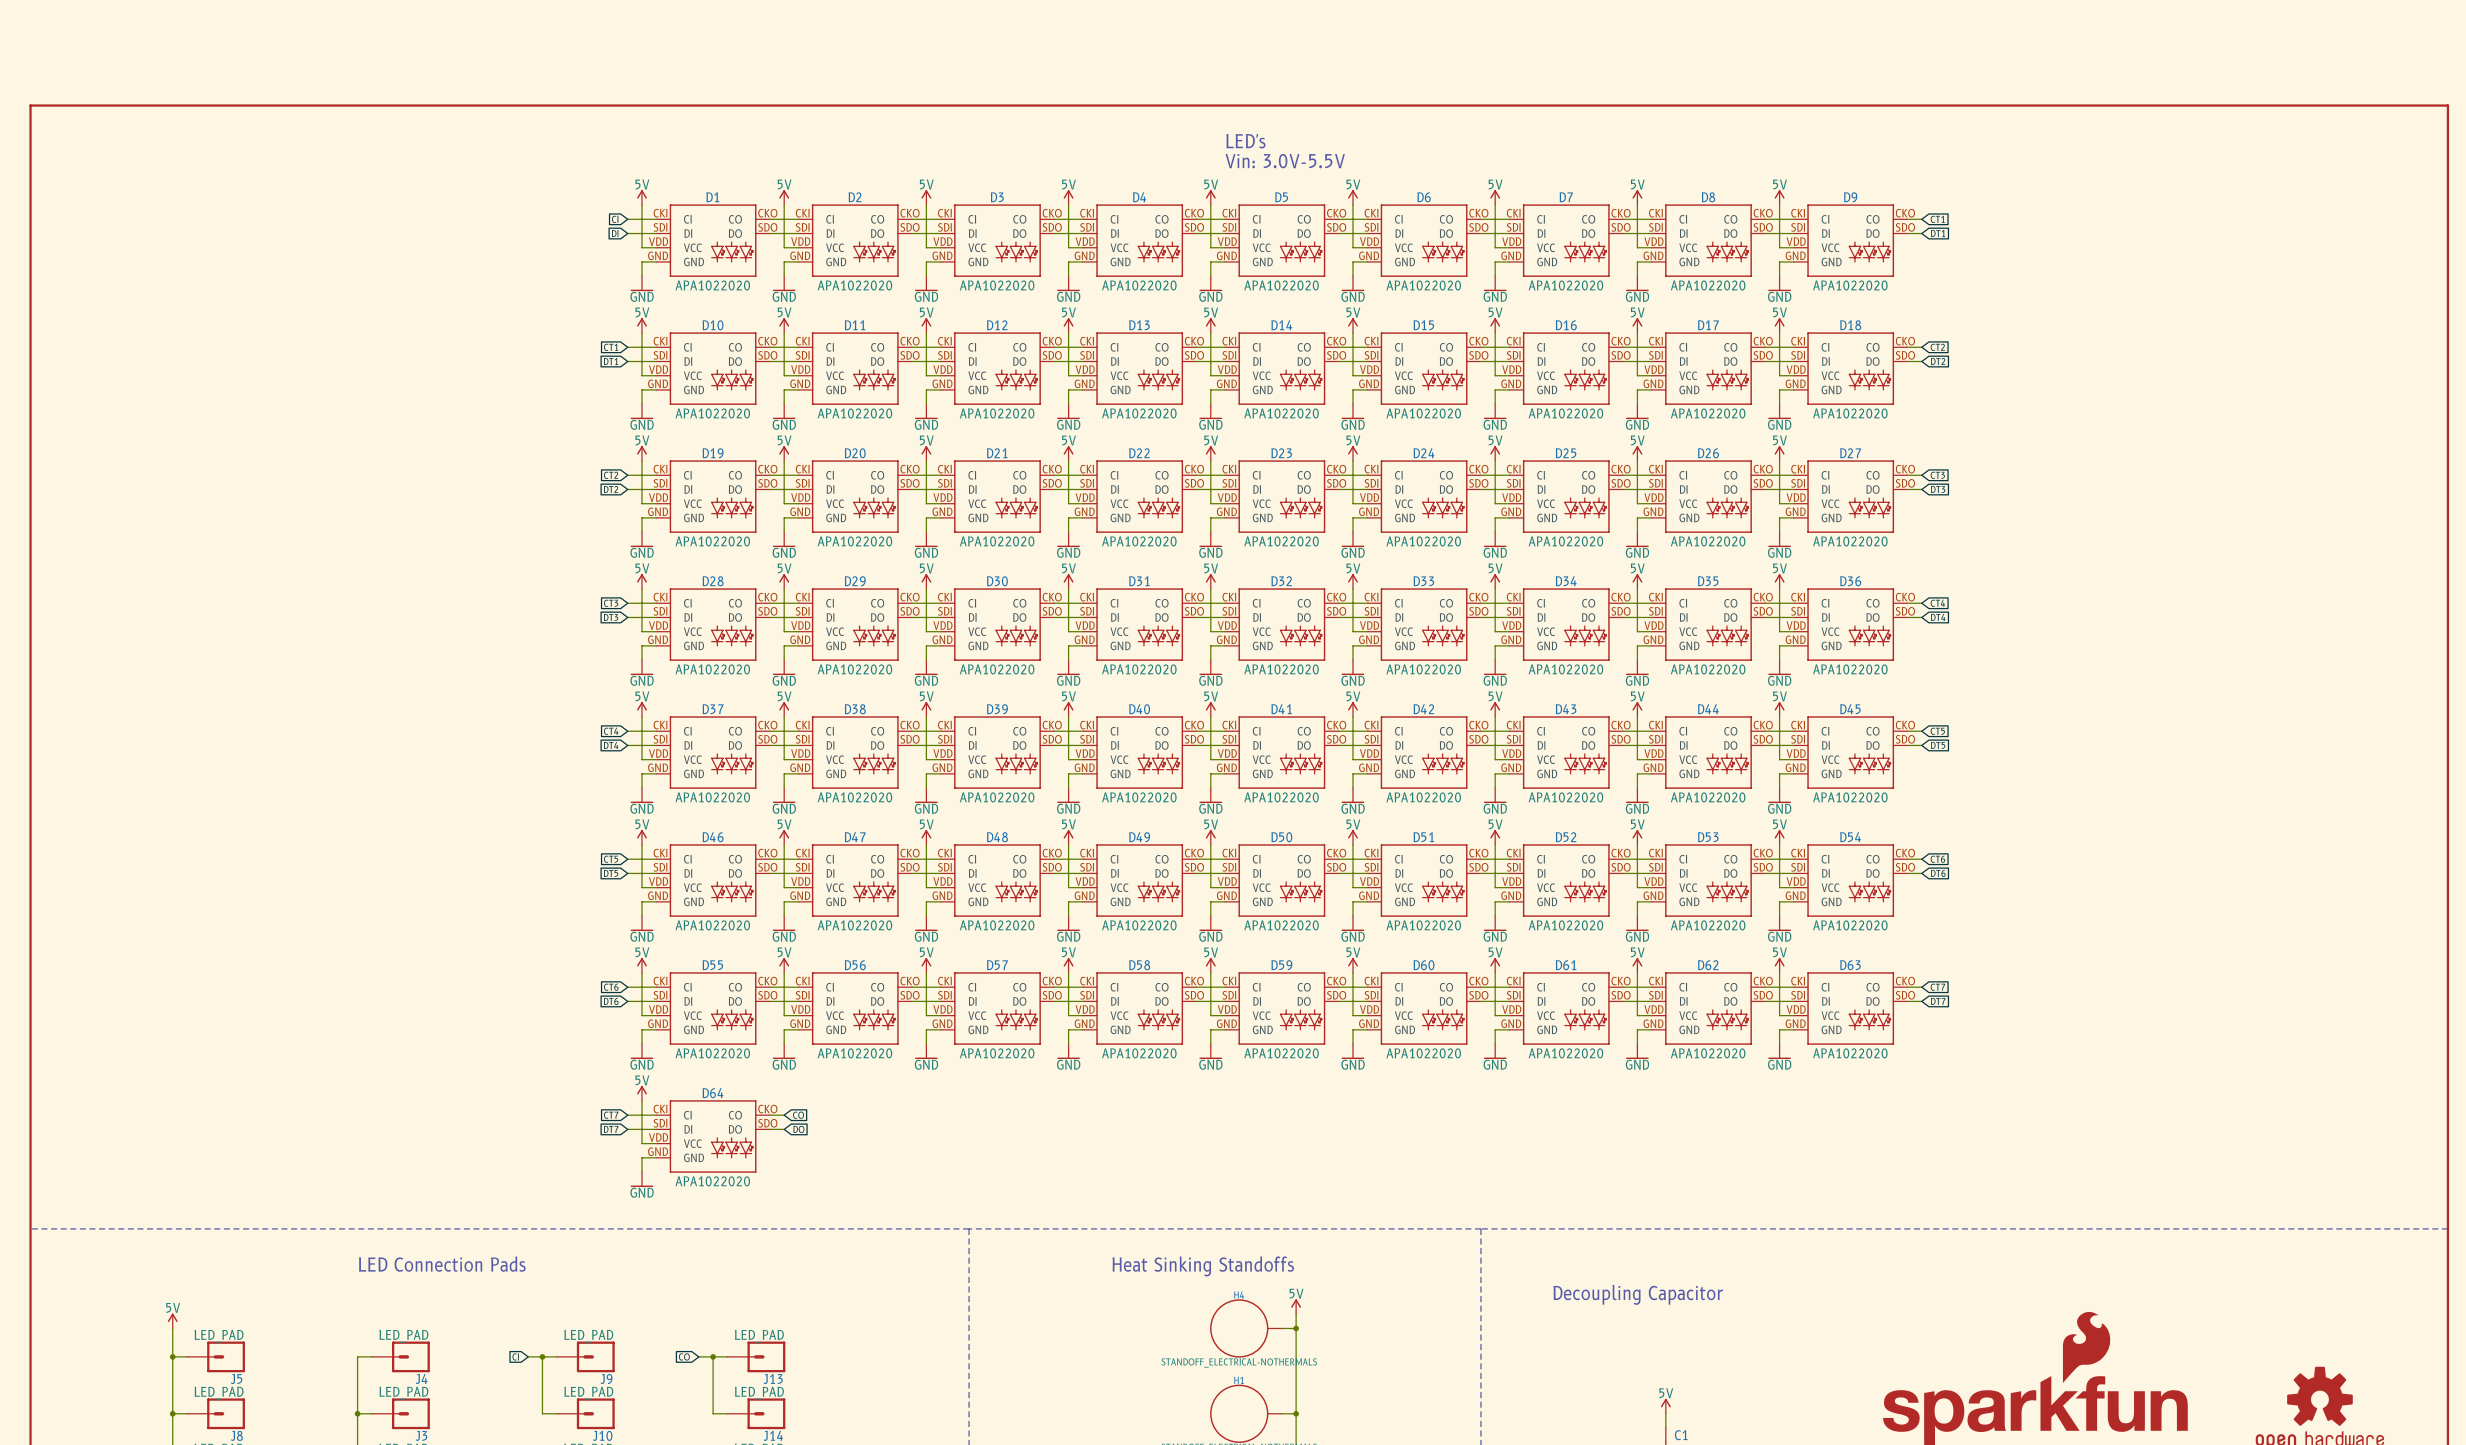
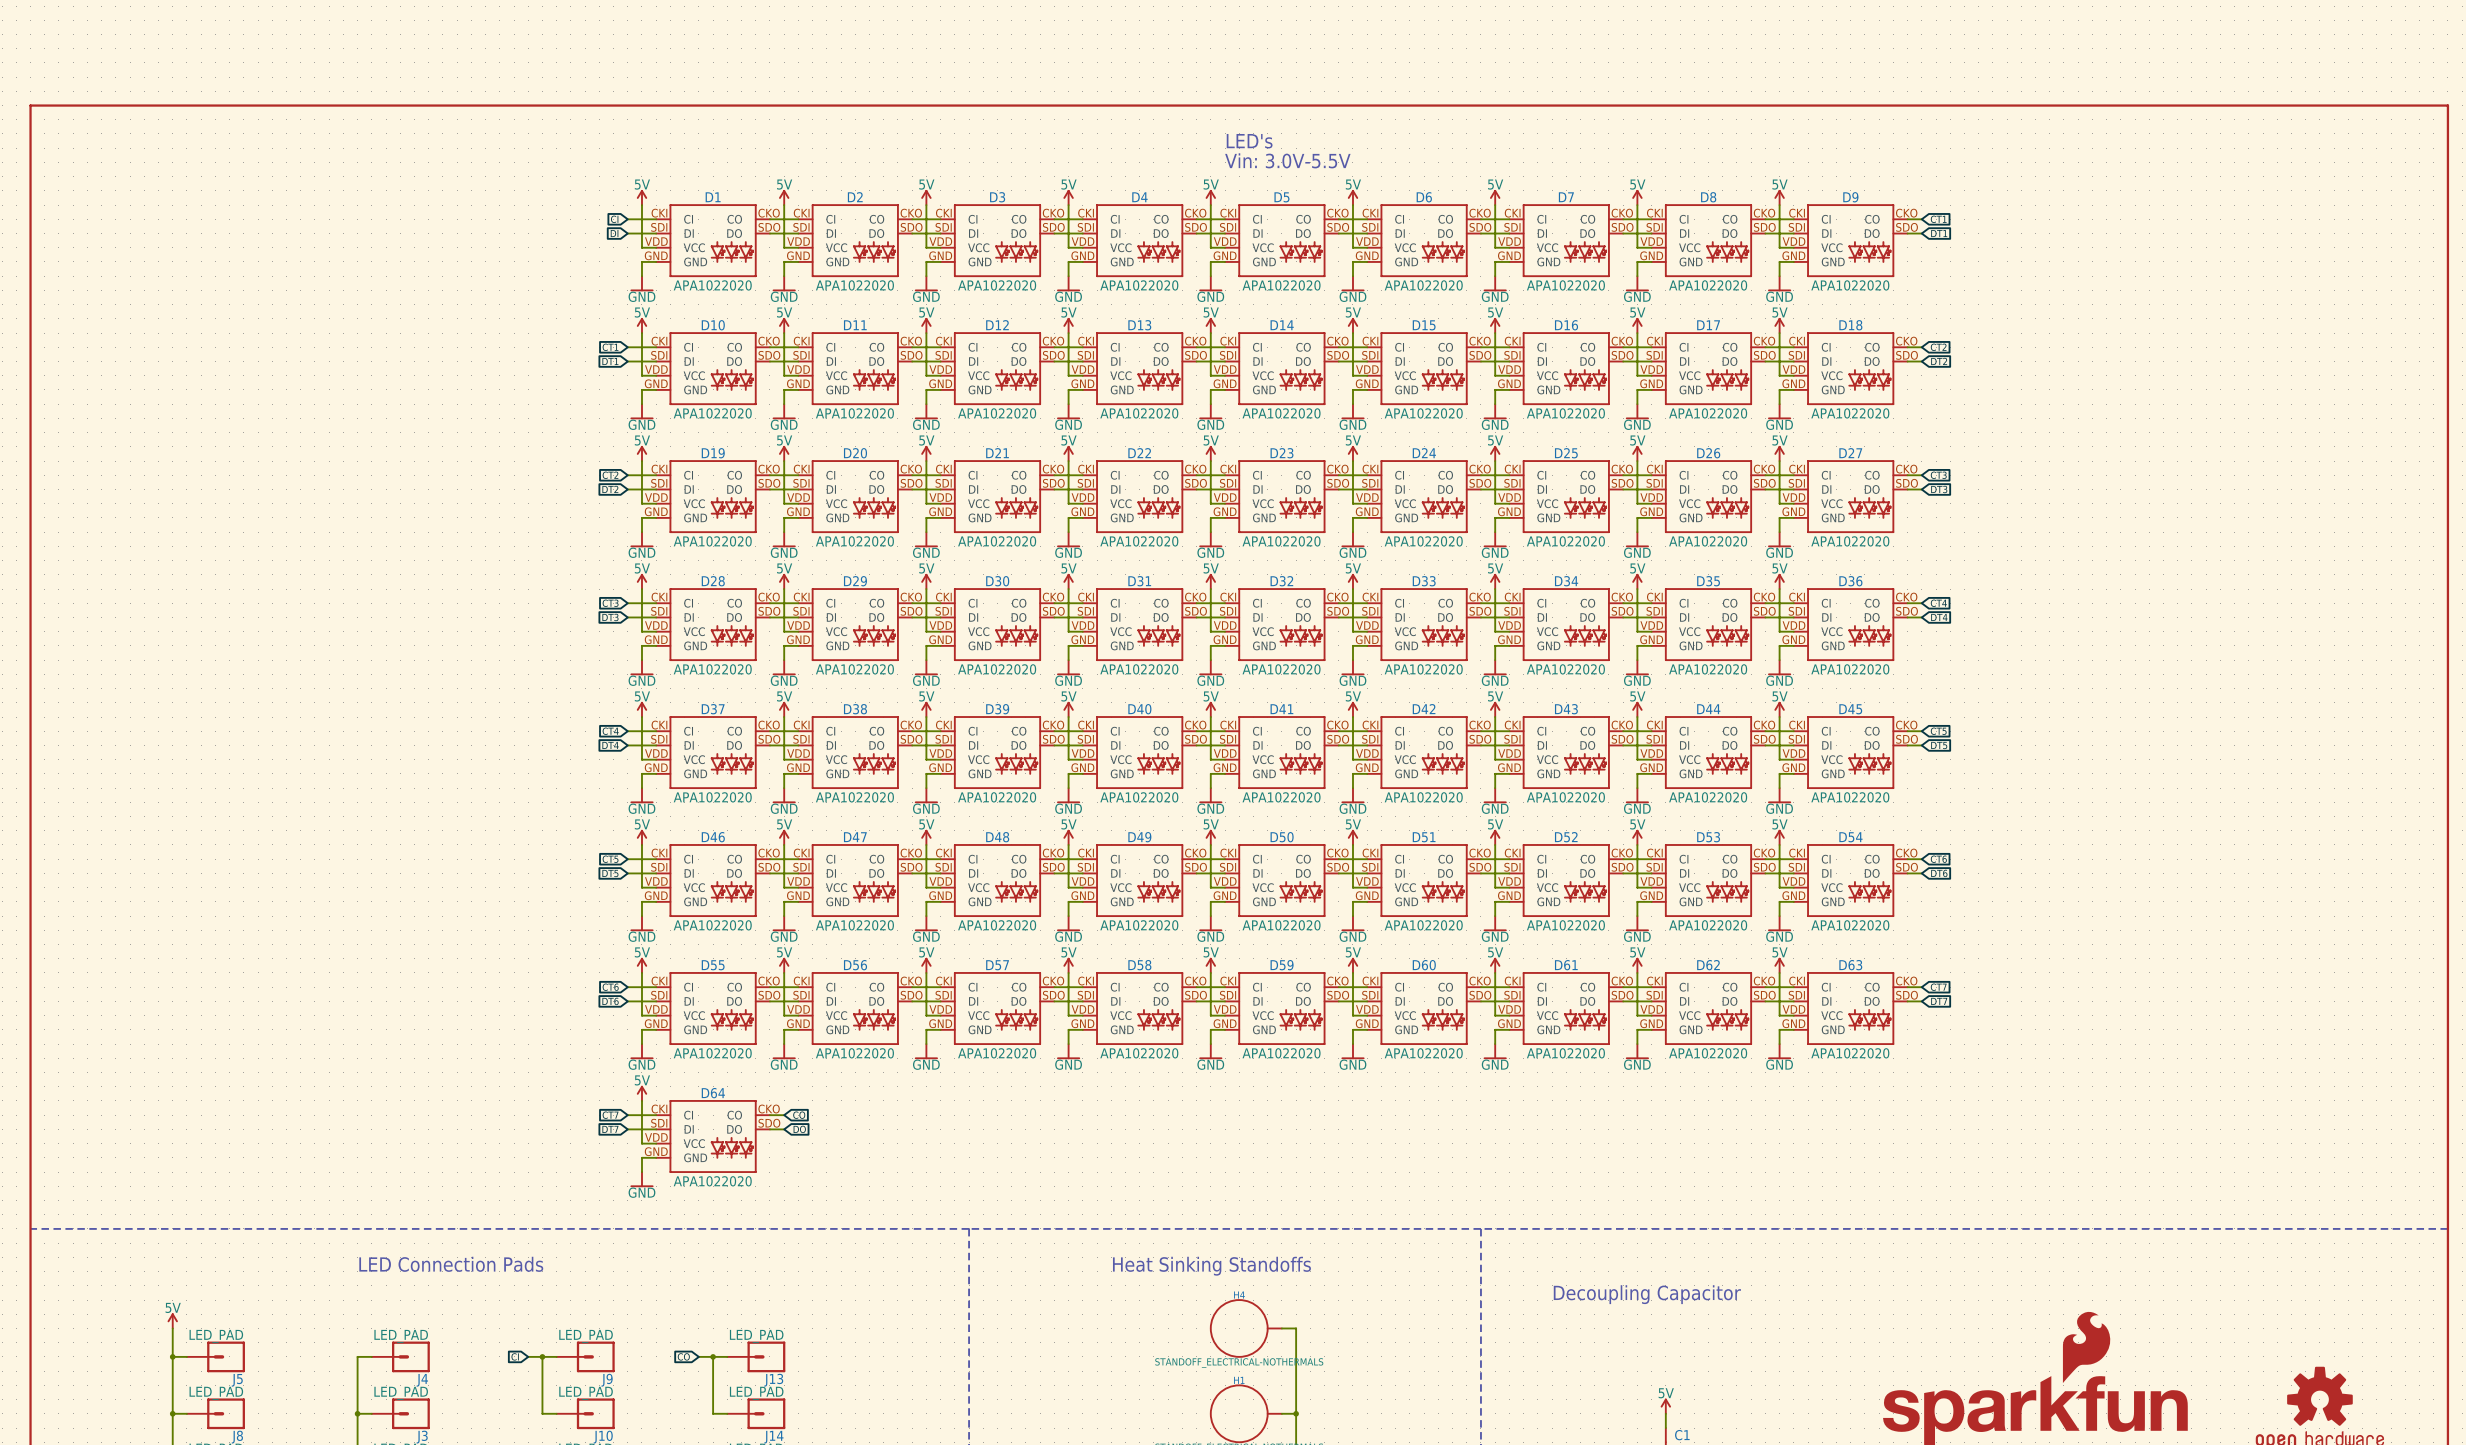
power symbol: 5V (1296, 1306) -> none
wire: (1296, 1314) (1296, 1328) -> none
junction: (1296, 1328) -> none

